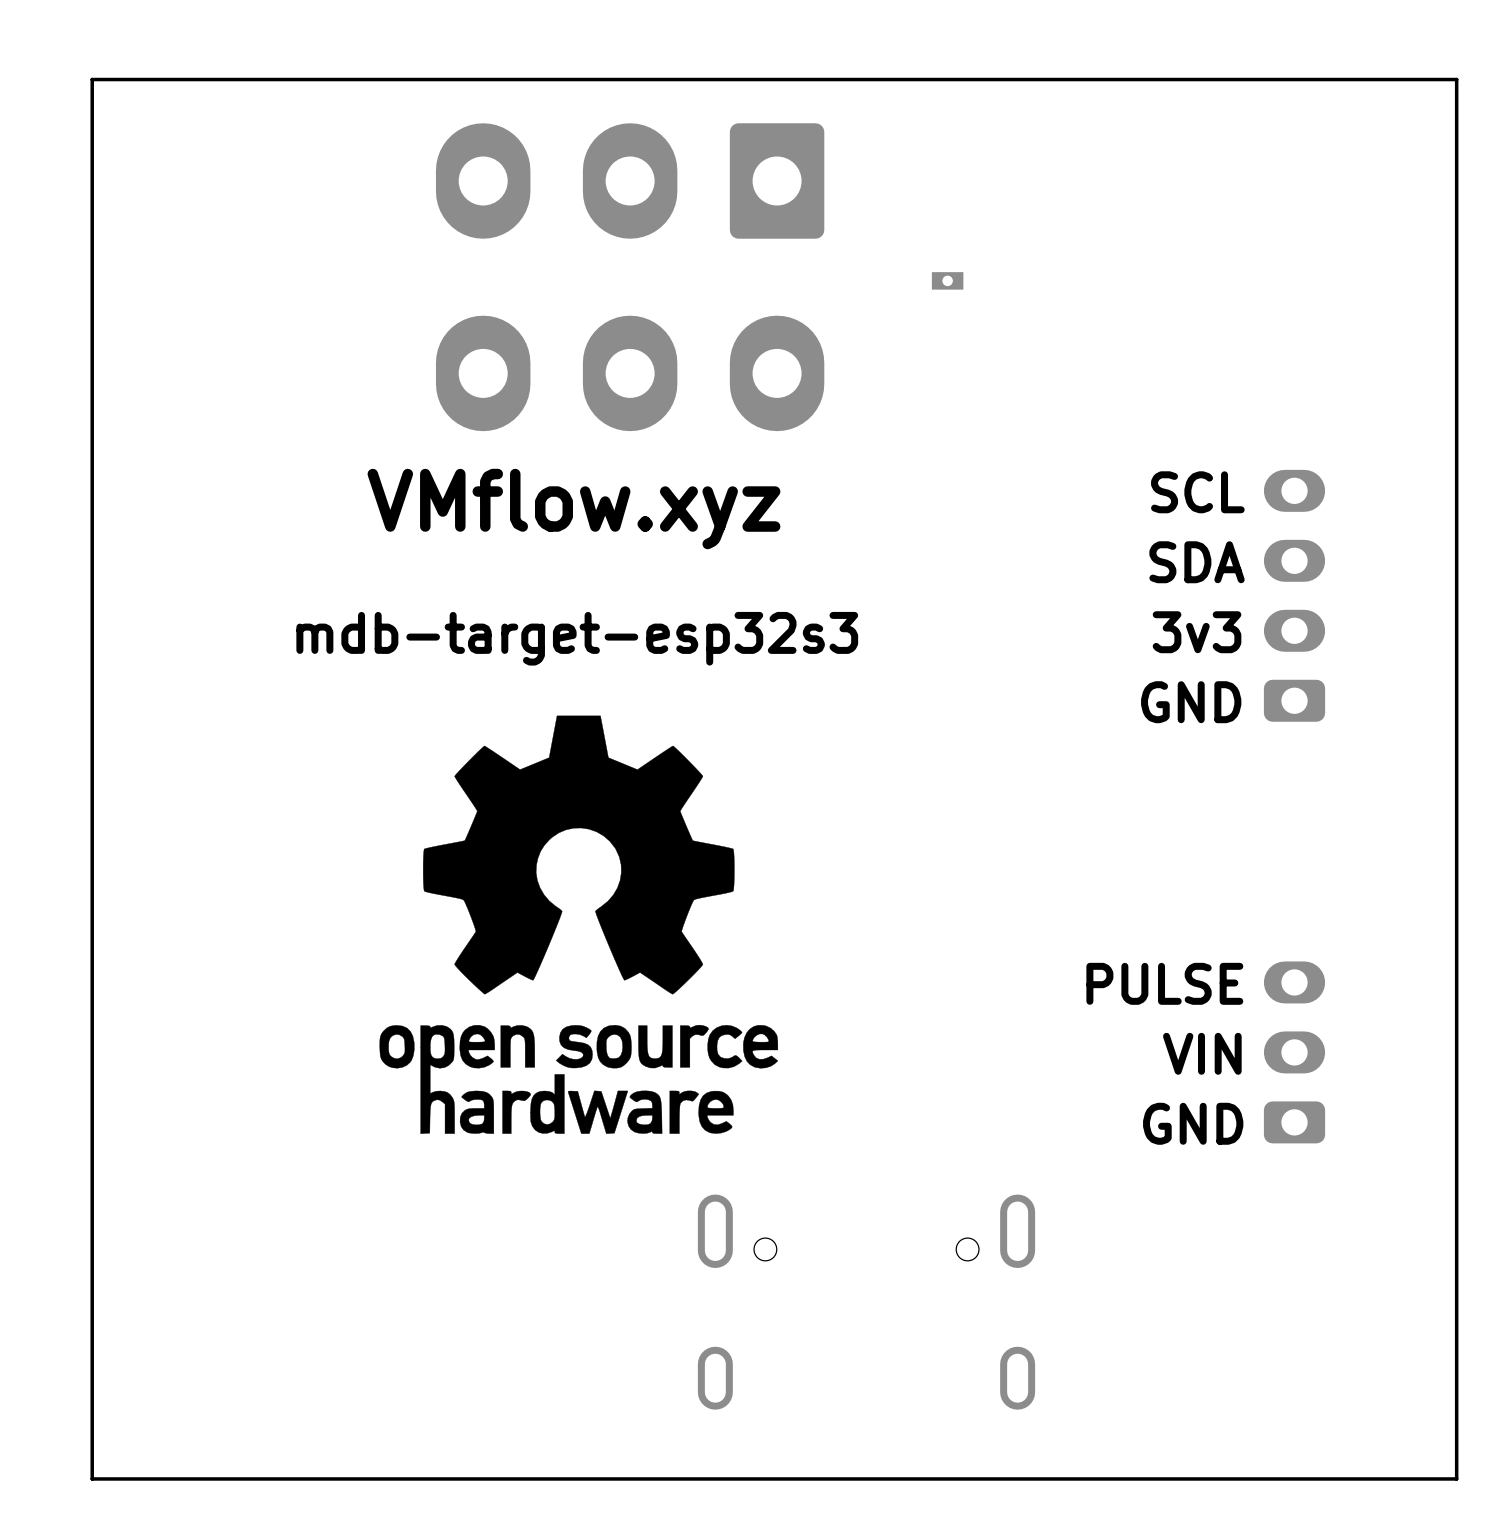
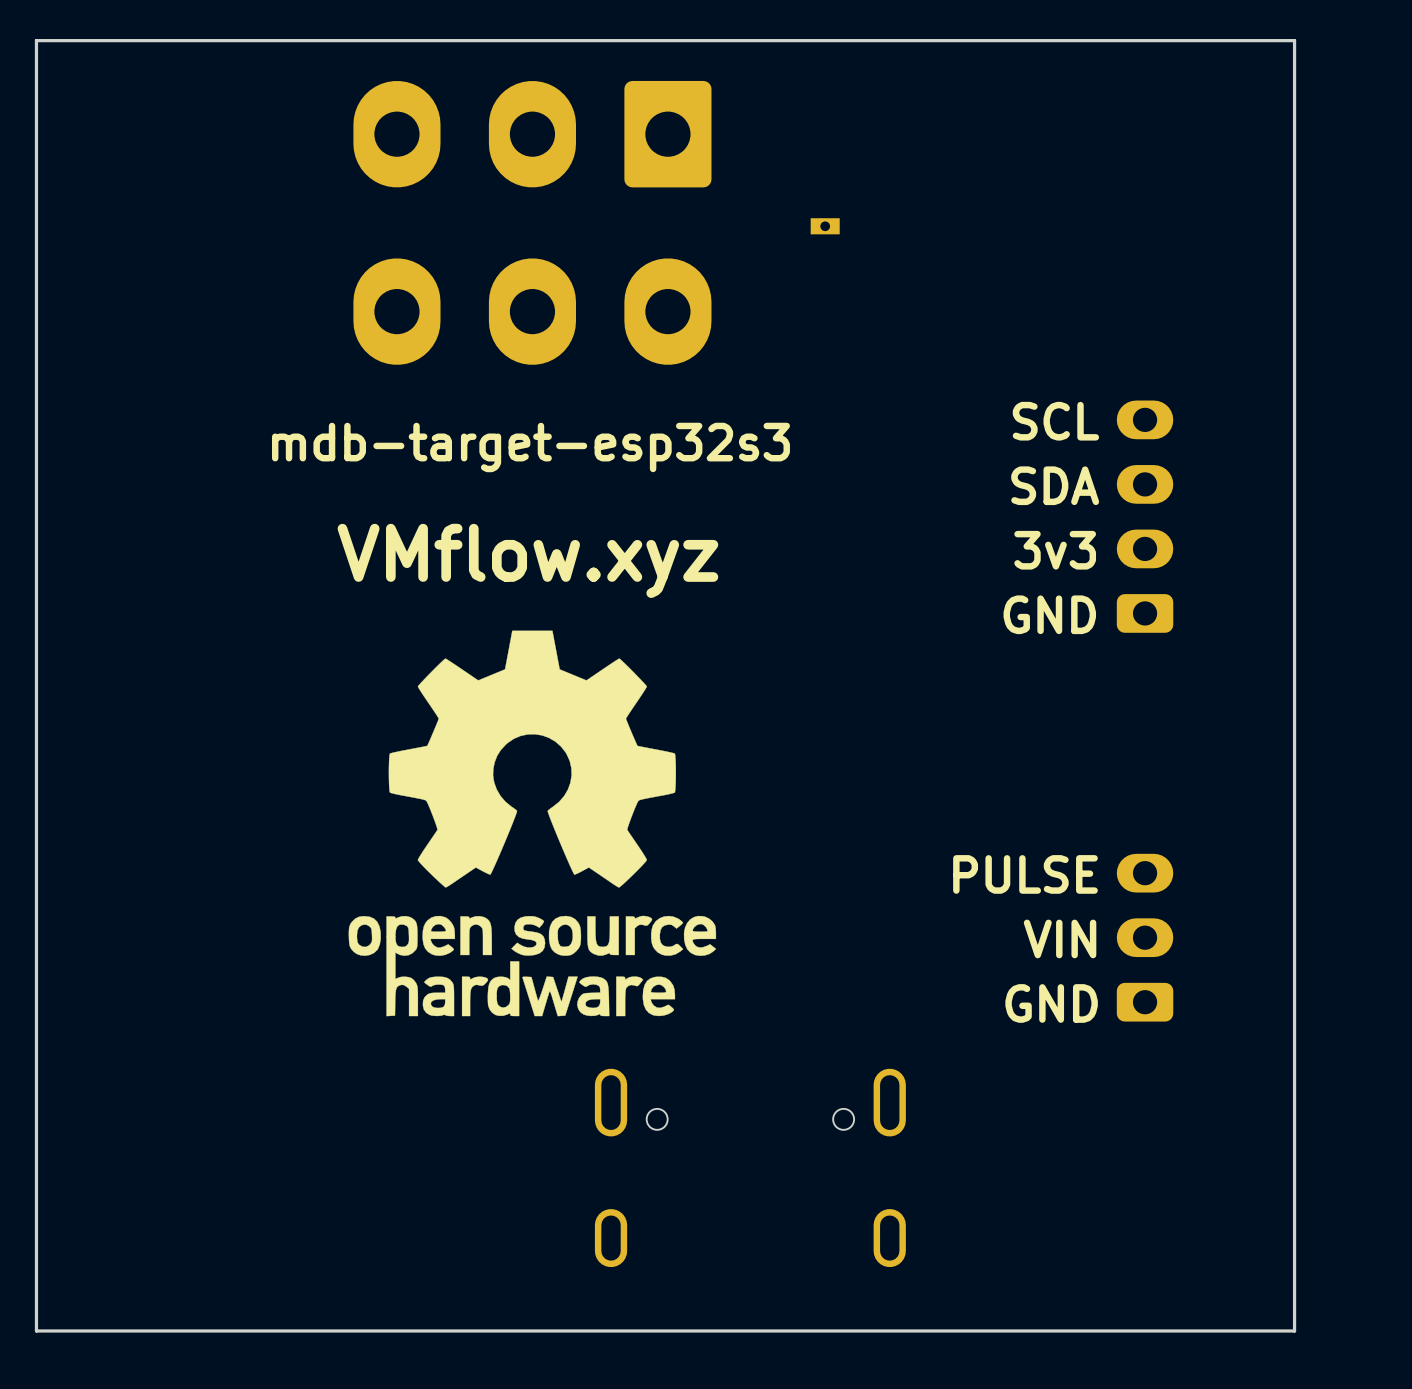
text: VMflow.xyz (573, 509) -> mdb-target-esp32s3 (530, 447)
text: mdb-target-esp32s3 (577, 638) -> none
text: none -> VMflow.xyz (527, 560)
drawing position: (578, 924) -> (532, 823)

